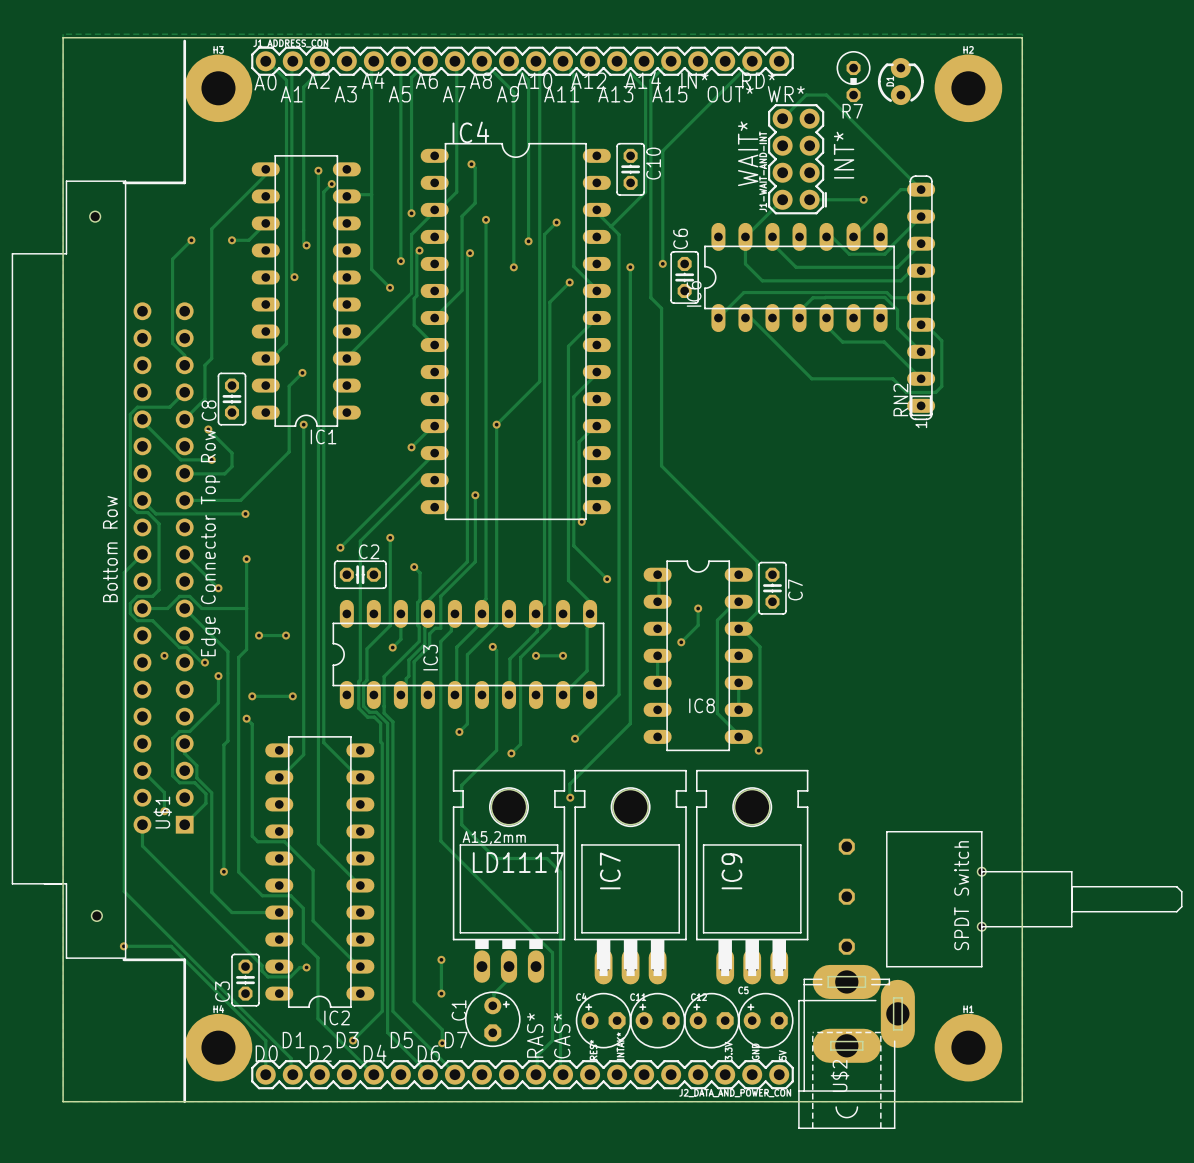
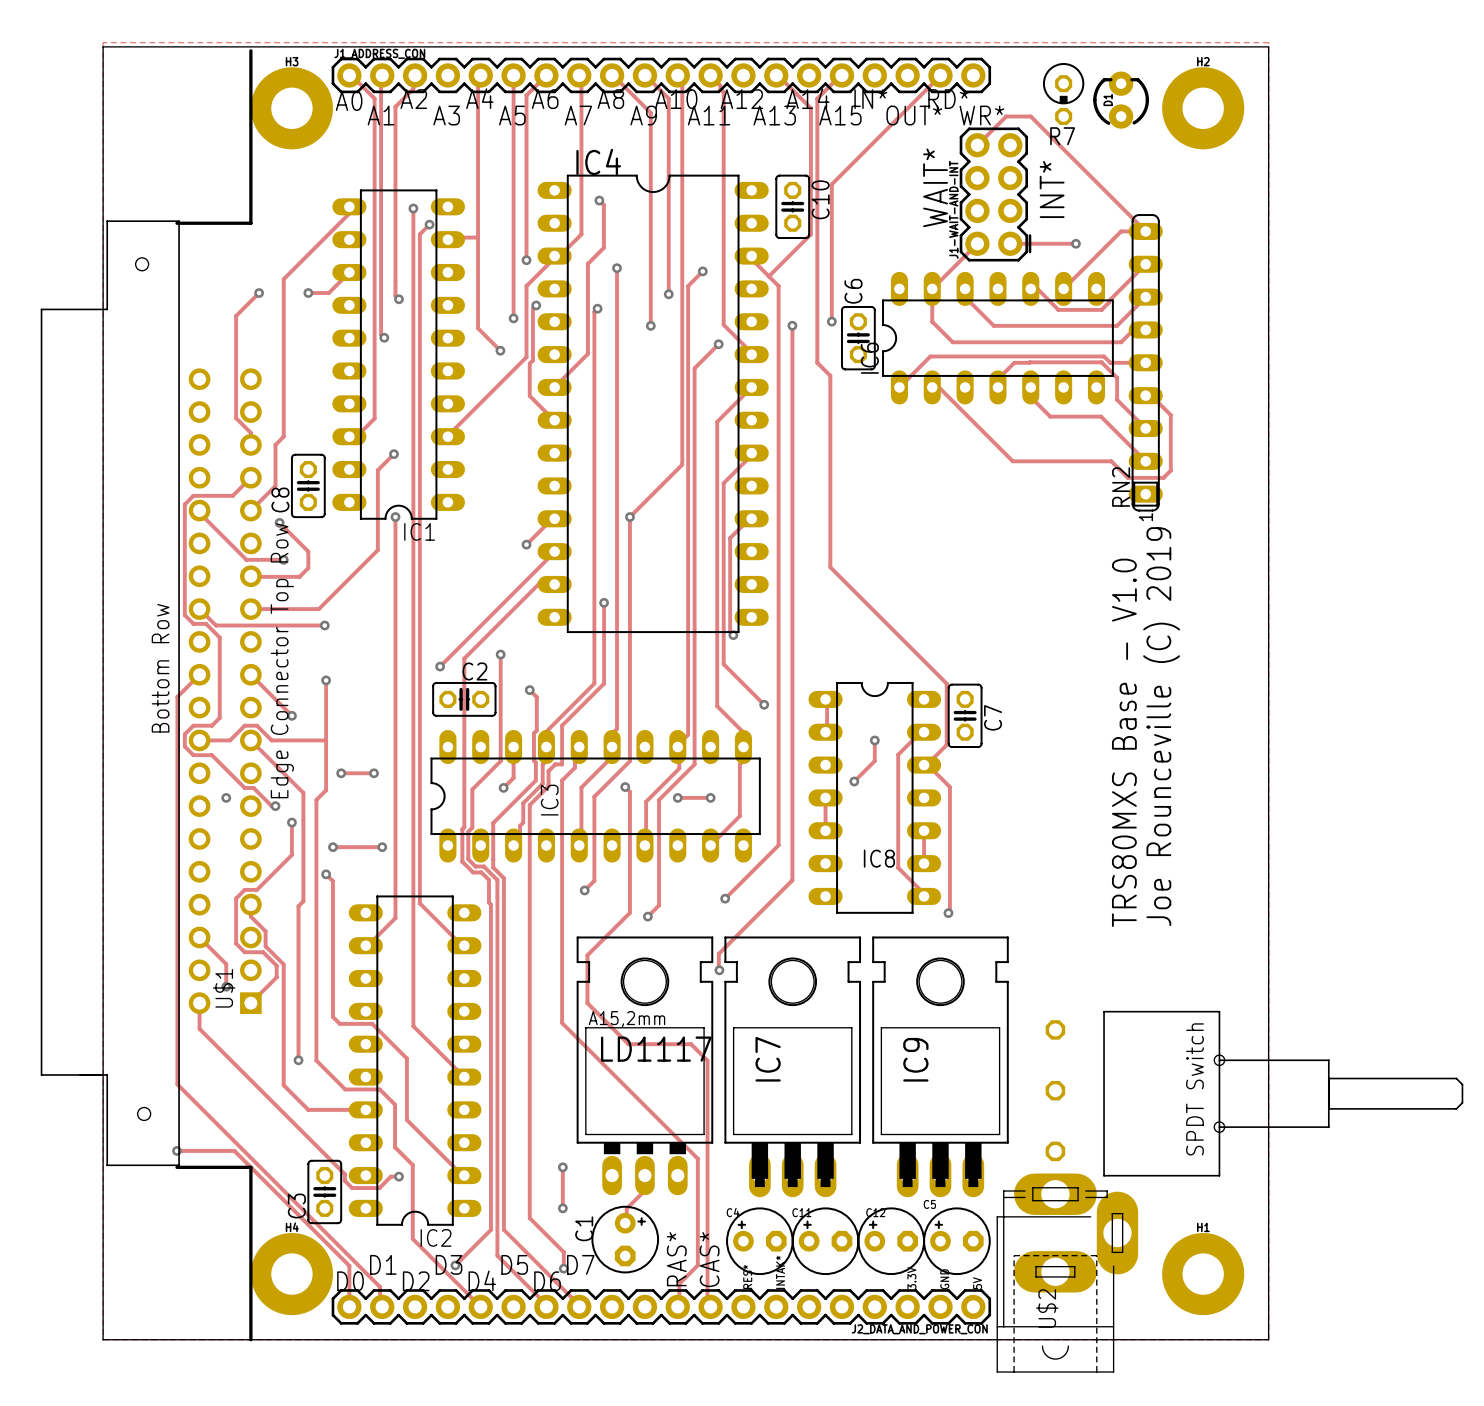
text: none -> Joe Rounceville (C) 2019 (1161, 726)
text: none -> TRS80MXS Base - V1.0 (1124, 742)

